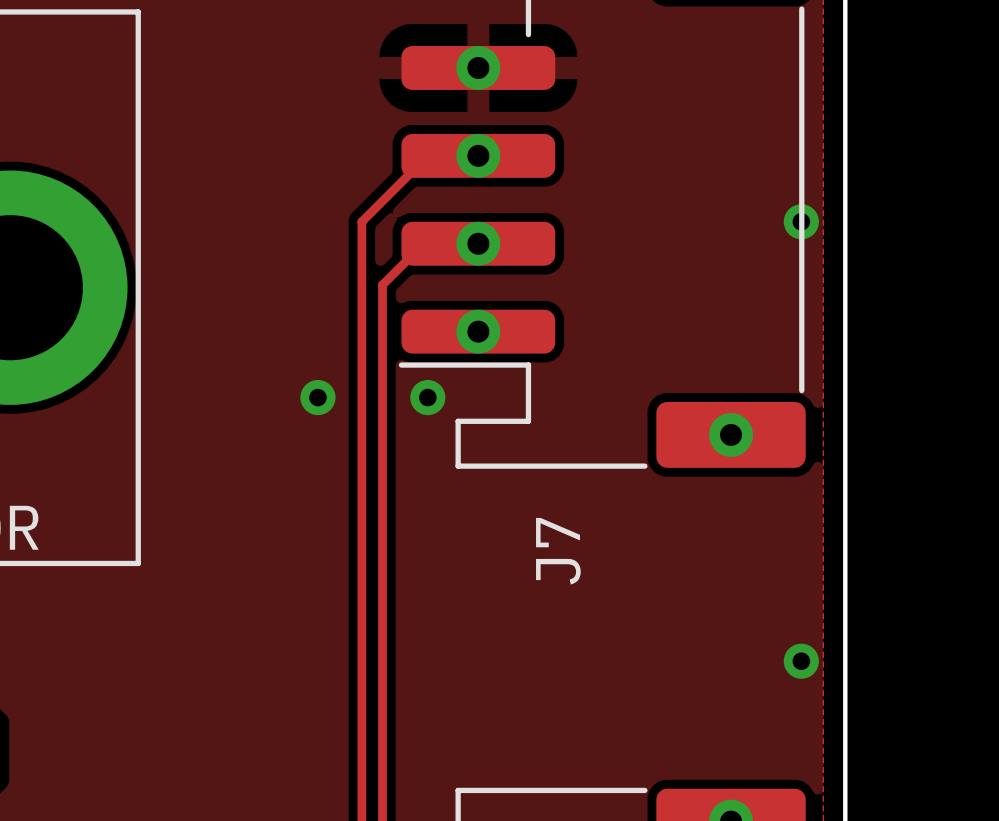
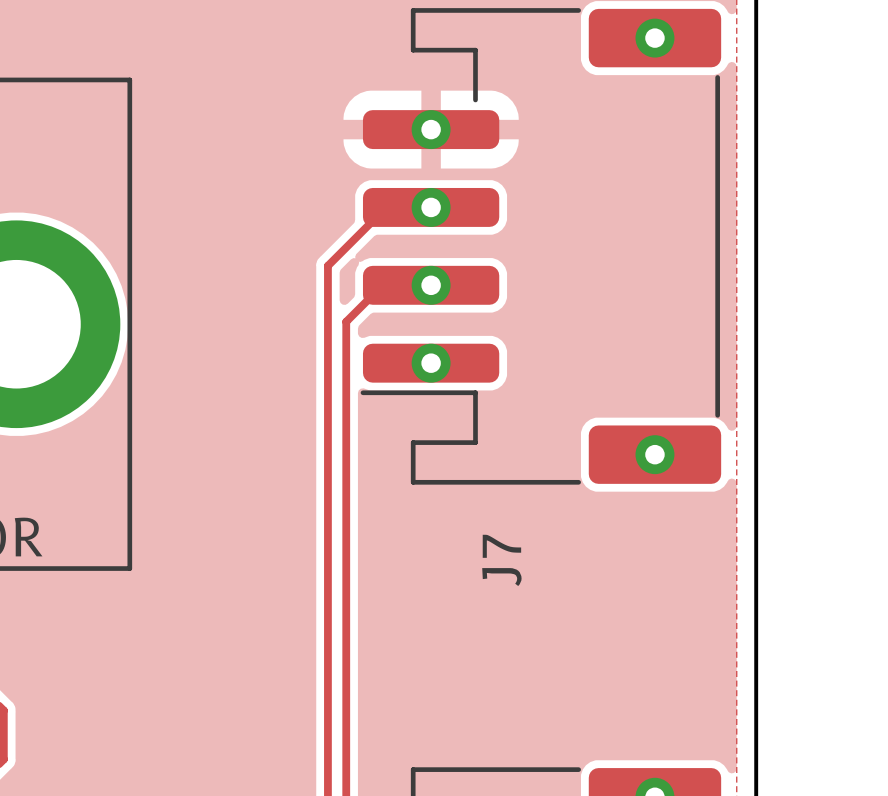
via: (801, 221) -> none
via: (317, 397) -> none
via: (427, 397) -> none
via: (801, 661) -> none

